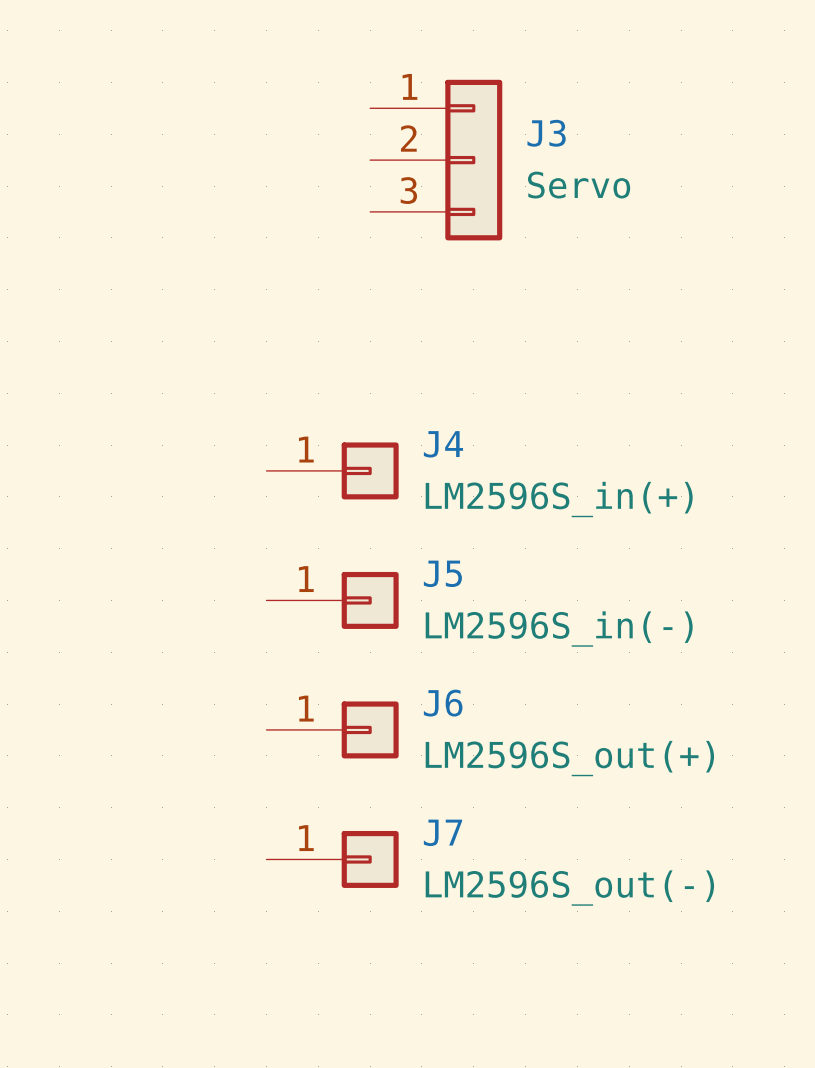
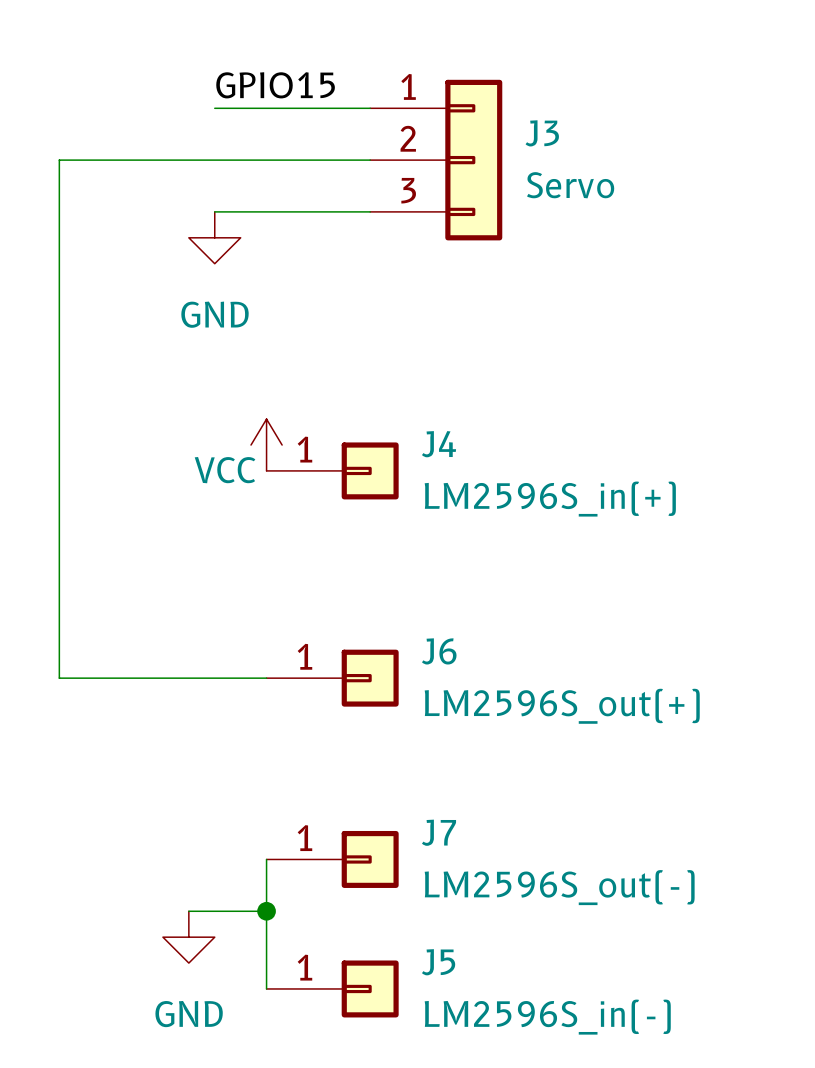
label: none -> GPIO15 (275, 85)
wire: none -> (214, 108) (370, 108)
wire: none -> (370, 160) (59, 160) (59, 678) (266, 678)
wire: none -> (214, 211) (370, 211)
power symbol: none -> GND (214, 237)
power symbol: none -> VCC (266, 445)
J5 position: (332, 600) -> (332, 988)
J6 position: (332, 729) -> (332, 678)
wire: none -> (266, 859) (266, 988)
wire: none -> (188, 911) (266, 911)
junction: none -> (266, 911)
power symbol: none -> GND (188, 937)

